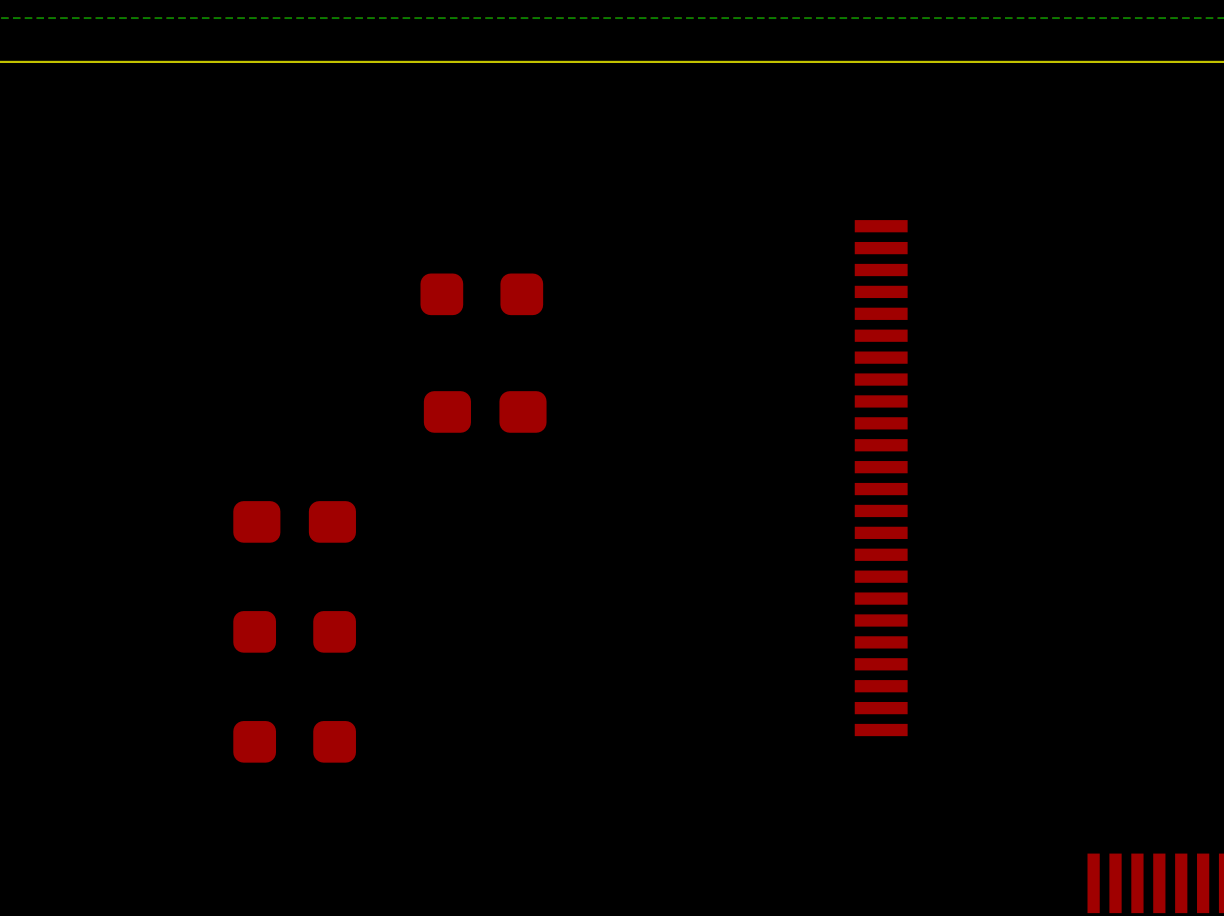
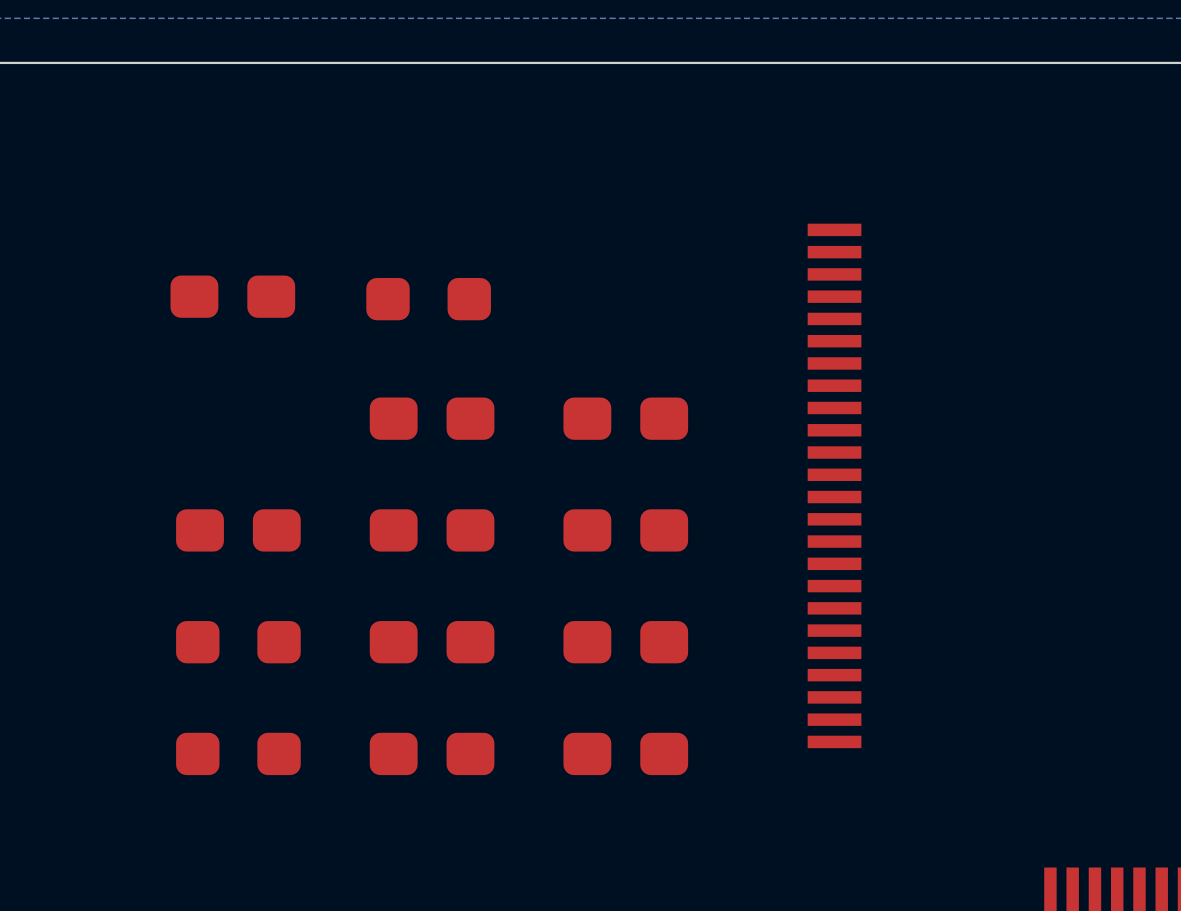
part: none -> (232, 296)
part: none -> (625, 418)
part: none -> (432, 530)
part: none -> (625, 530)
part: none -> (432, 642)
part: none -> (625, 642)
part: none -> (432, 753)
part: none -> (625, 753)

